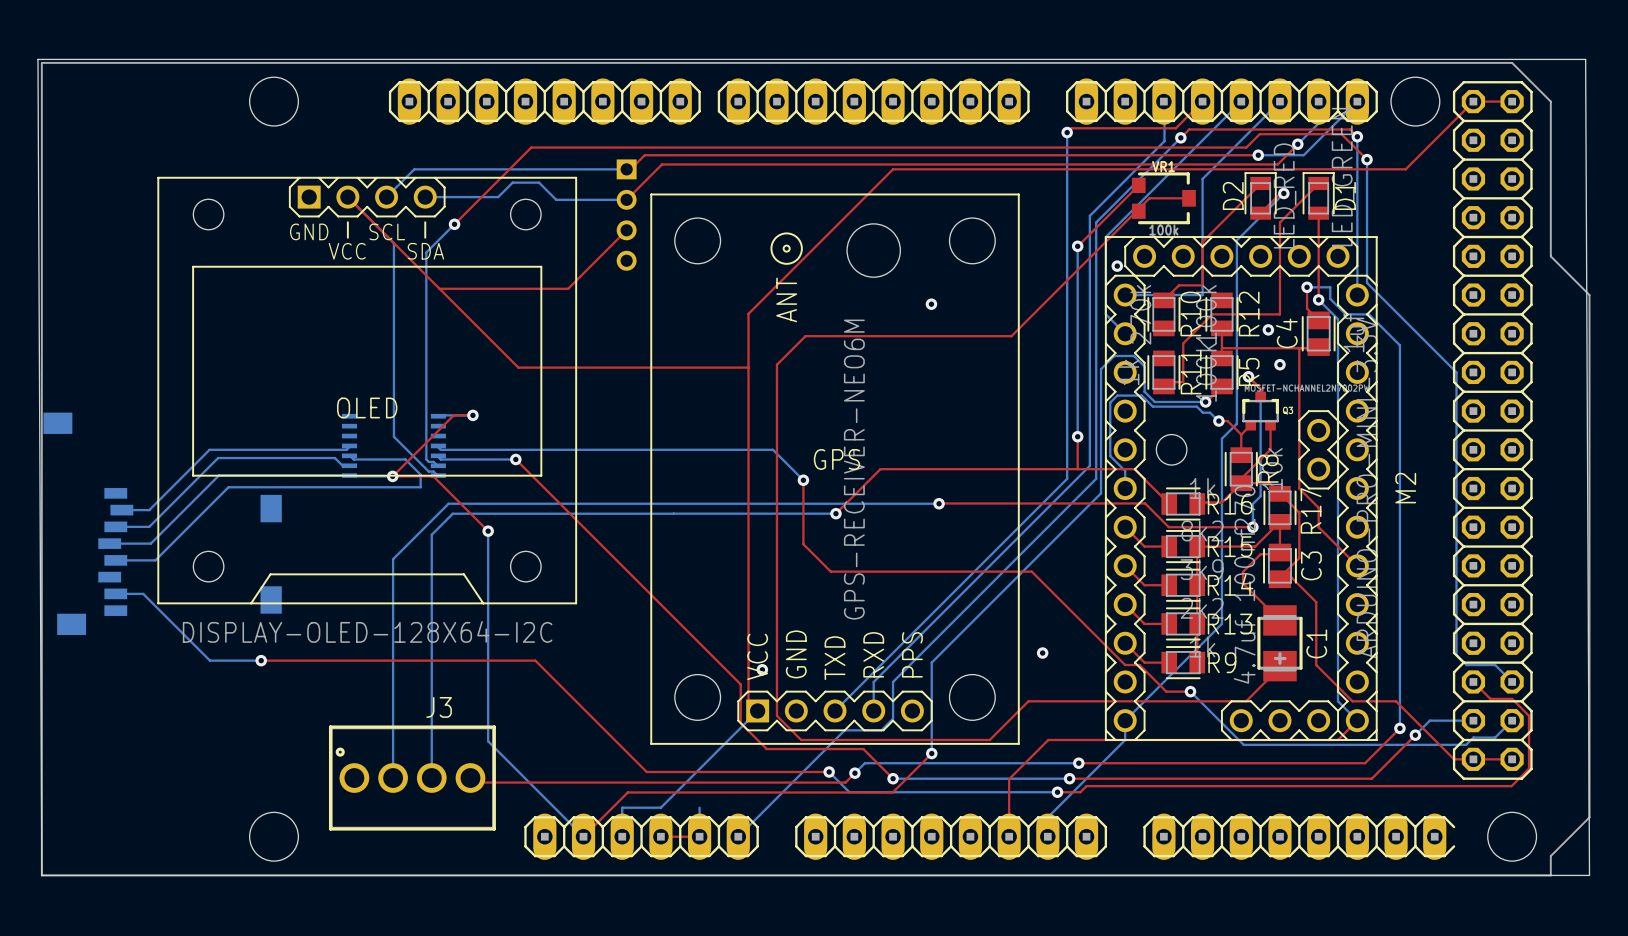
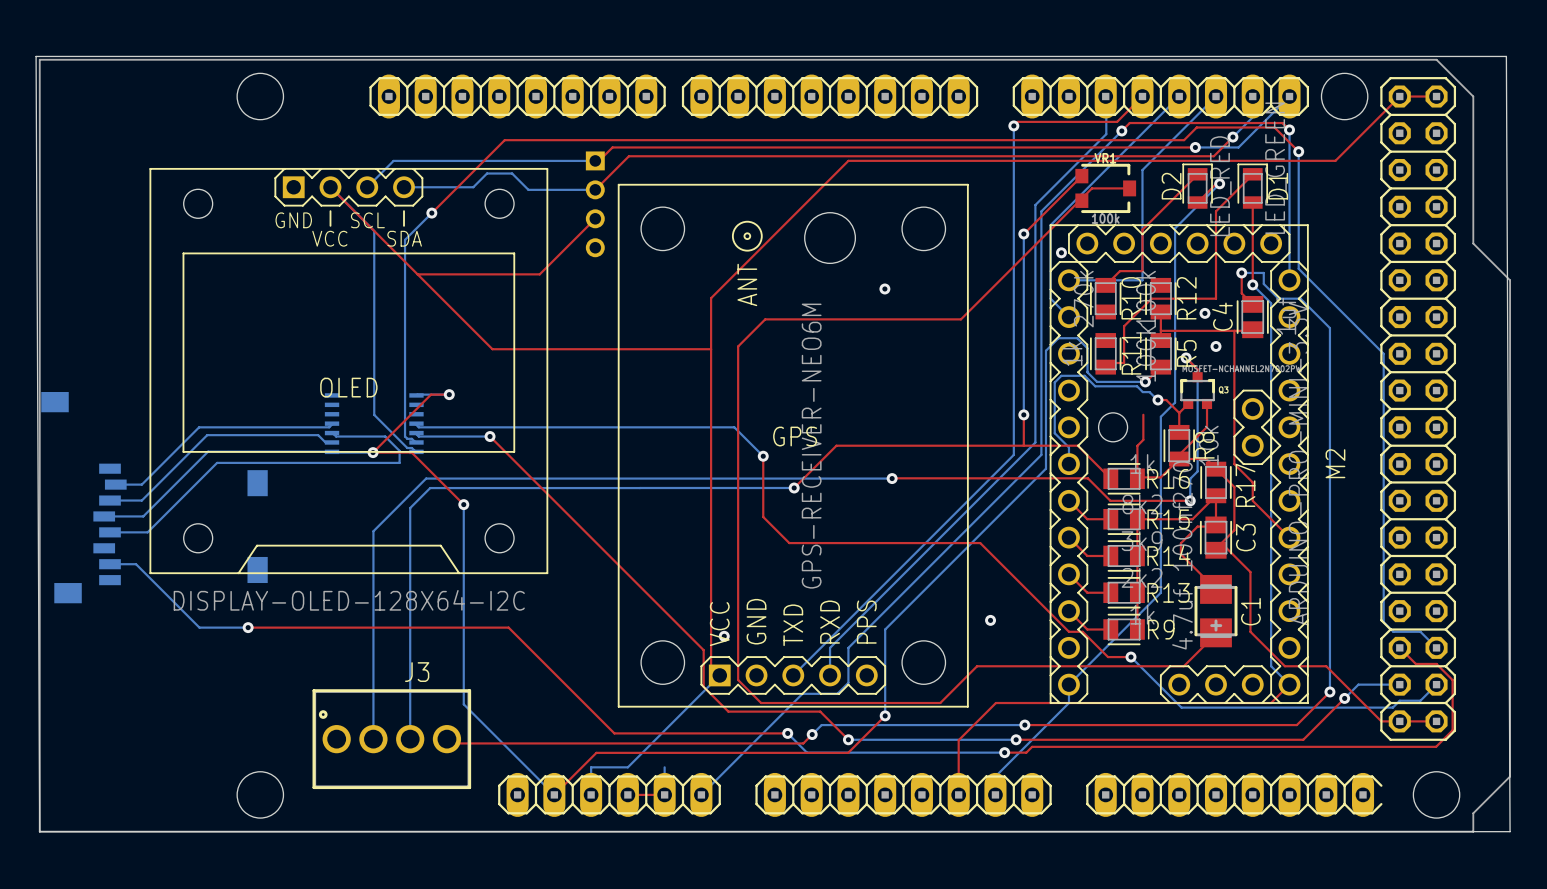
top track: none -> (1143, 414) (1143, 439) (1137, 445) (1137, 478)

